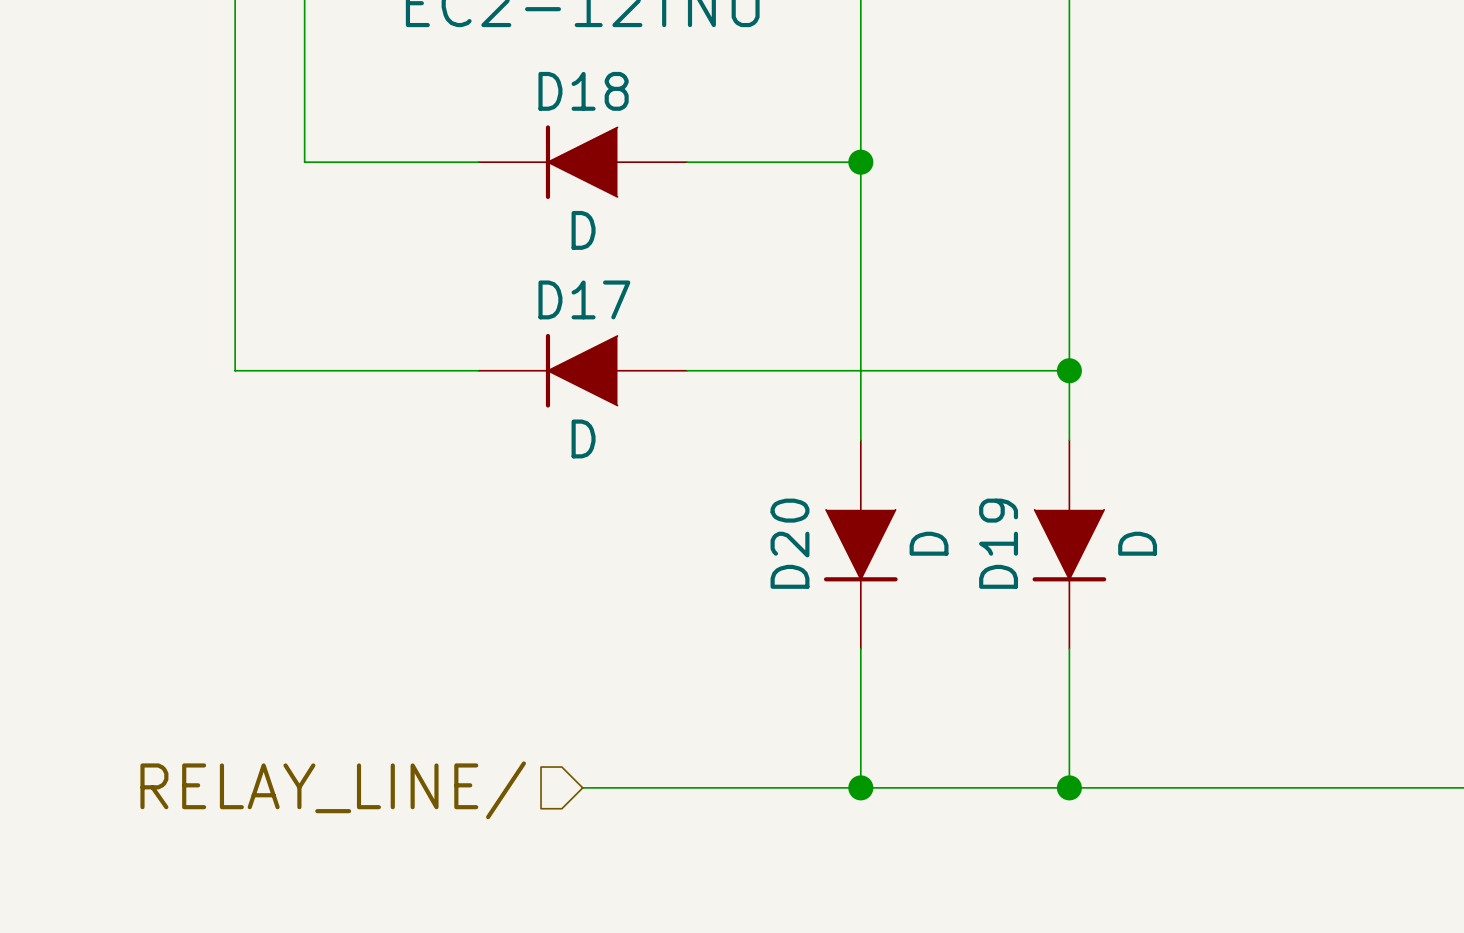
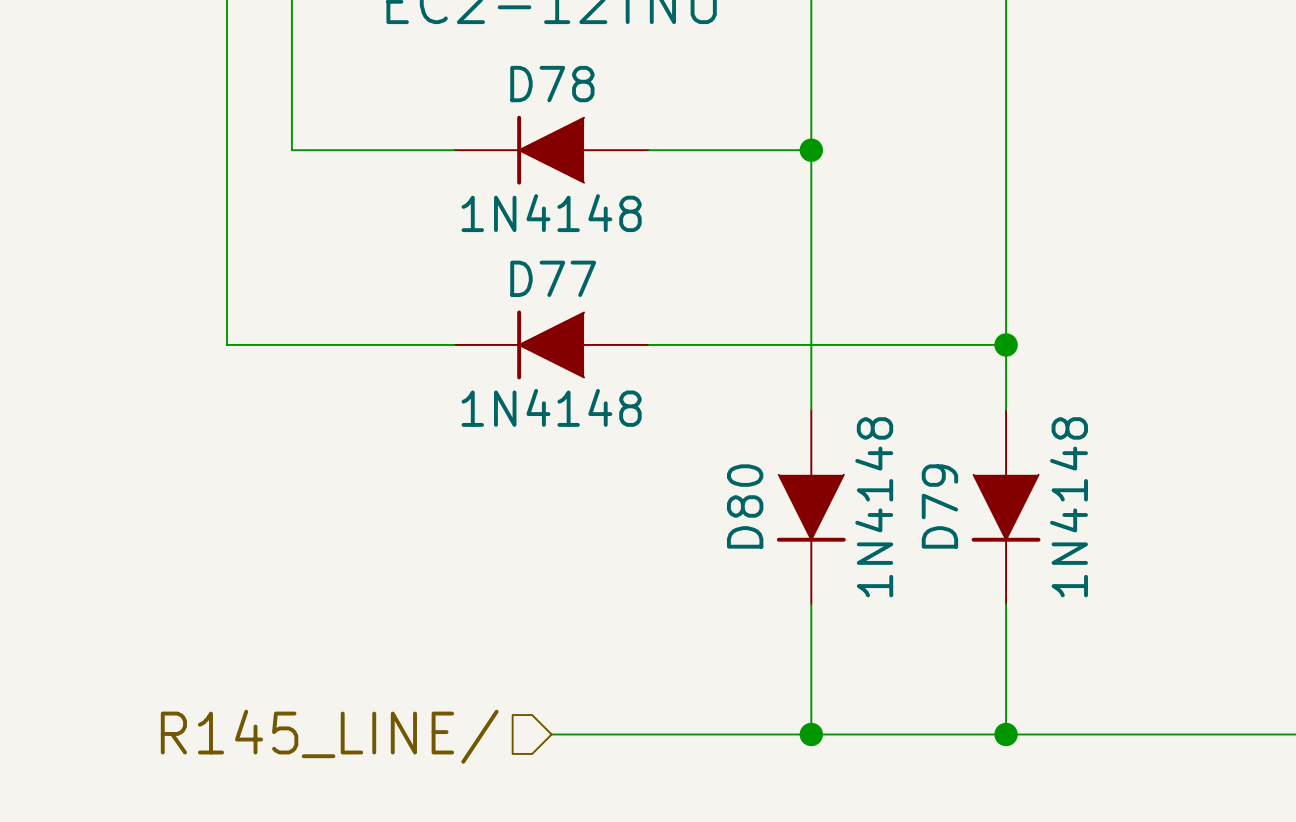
D18 name: D18 (583, 91) -> D78 (552, 84)
D18 value: D (583, 230) -> 1N4148 (551, 213)
D17 name: D17 (584, 299) -> D77 (553, 278)
D17 value: D (583, 438) -> 1N4148 (551, 407)
D20 name: D20 (790, 543) -> D80 (745, 506)
D20 value: D (929, 543) -> 1N4148 (874, 507)
D19 name: D19 (998, 543) -> D79 (939, 506)
D19 value: D (1137, 543) -> 1N4148 (1069, 507)
hierarchical label: RELAY_LINE/ (333, 790) -> R145_LINE/ (329, 736)

